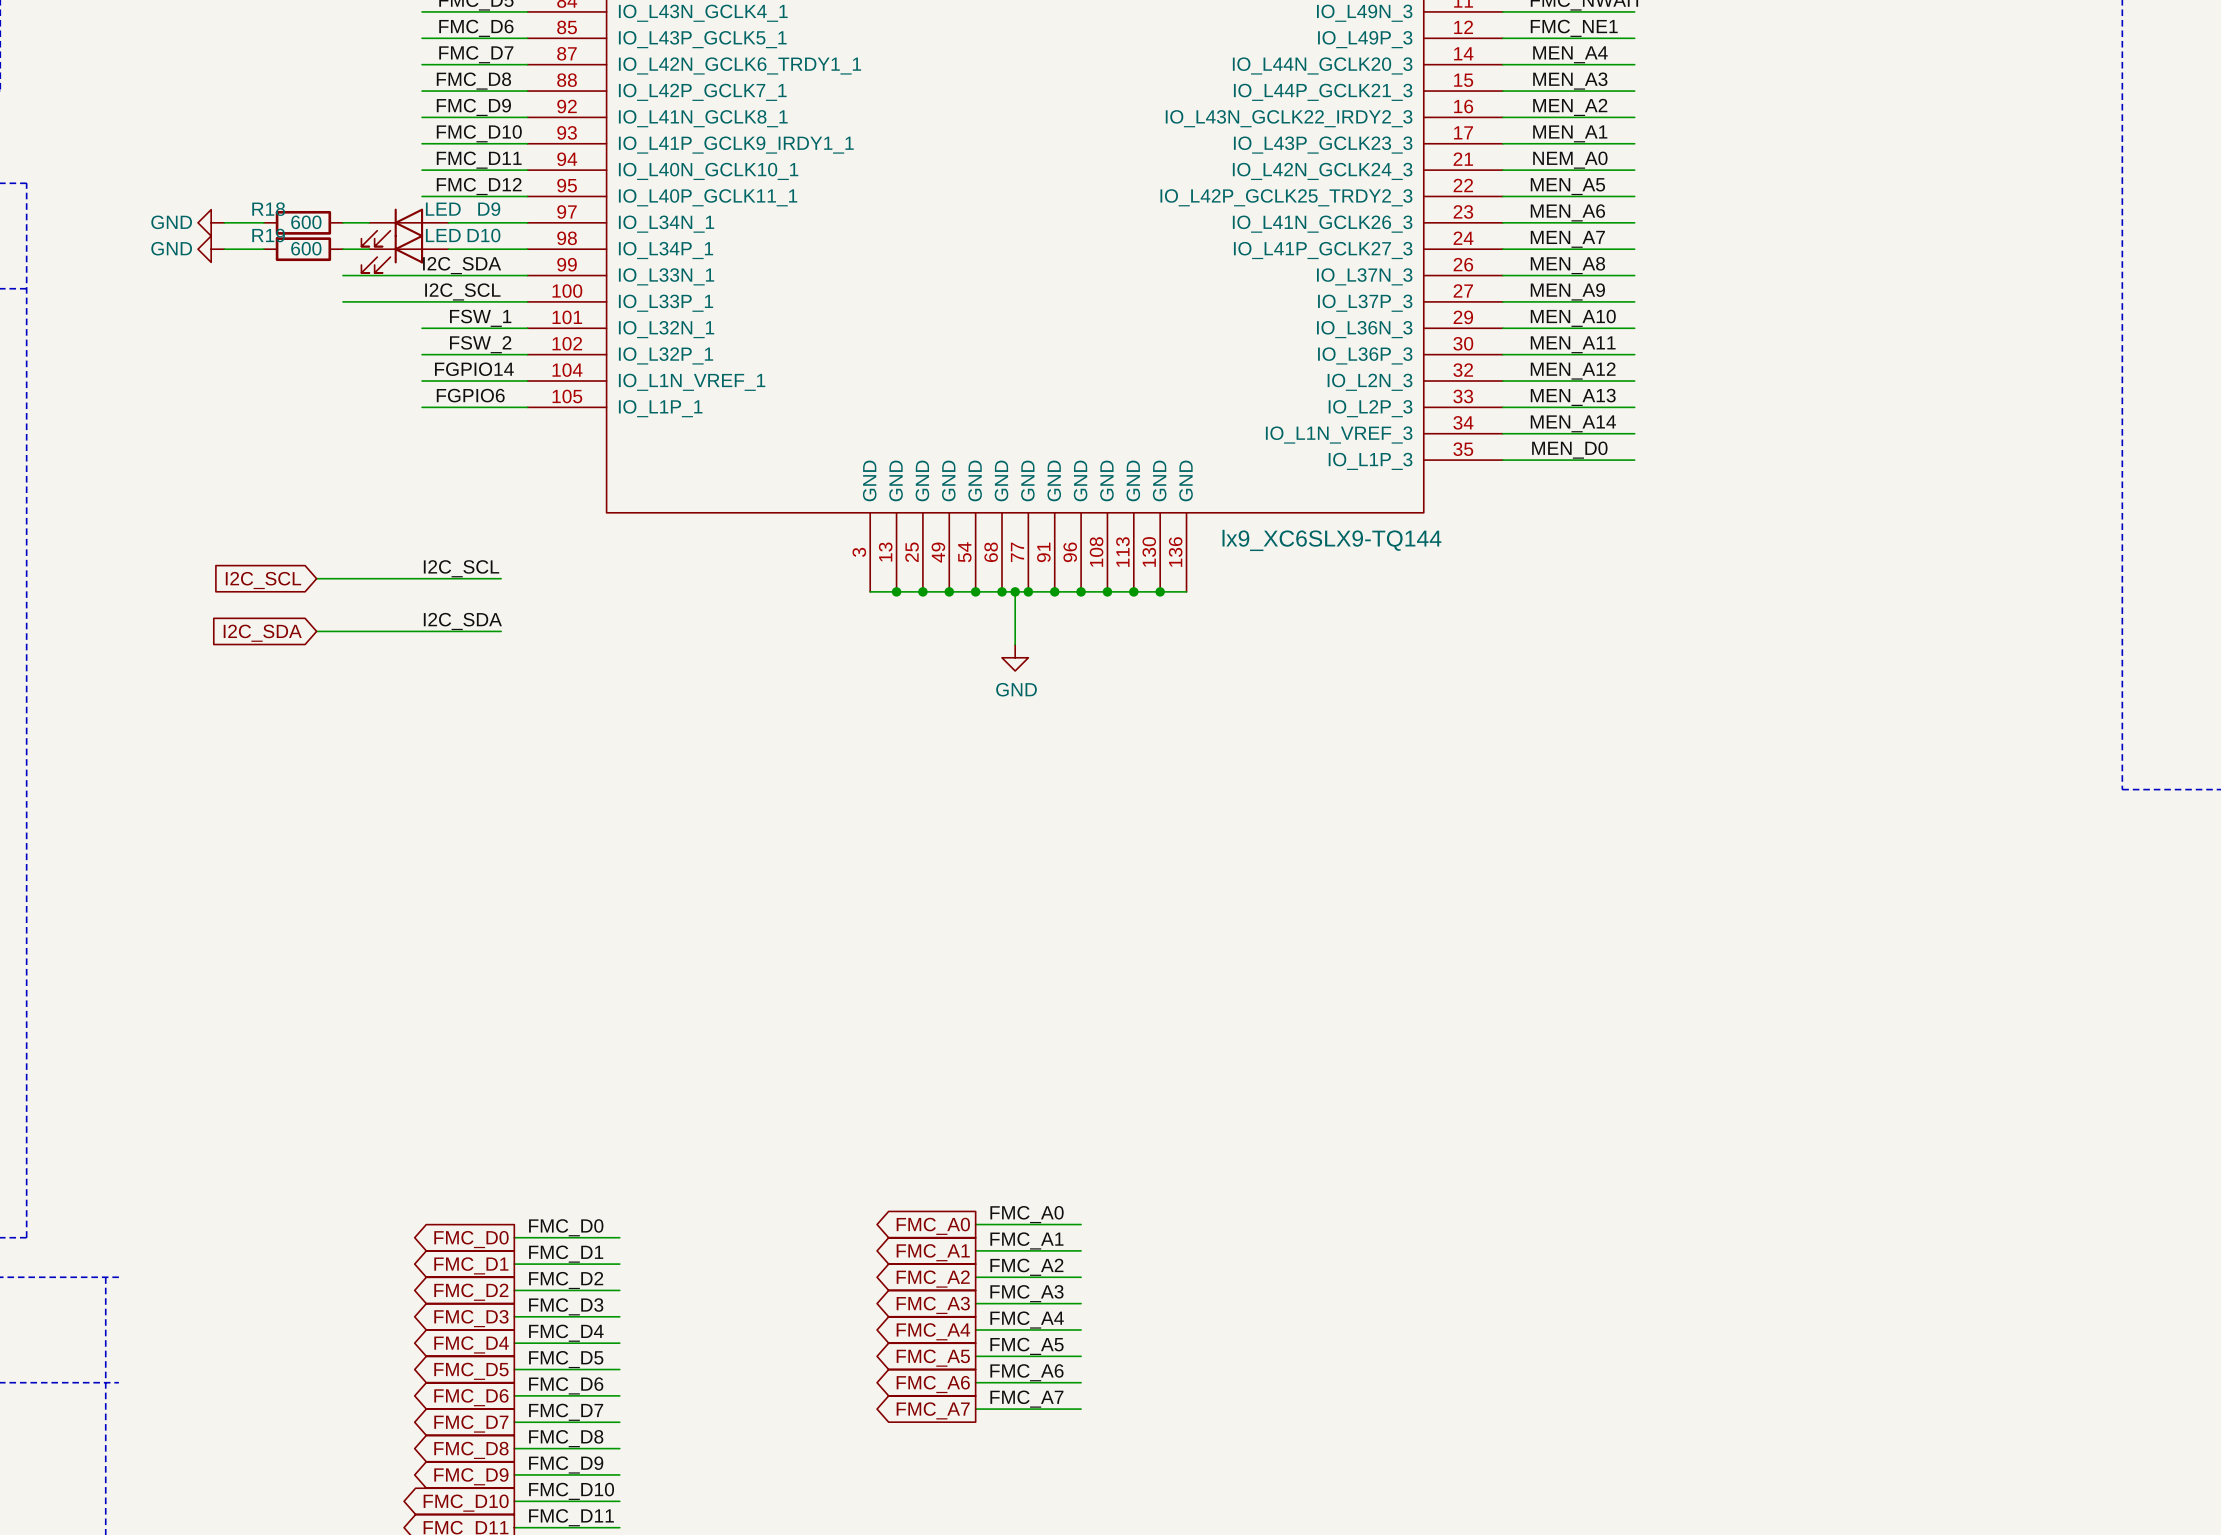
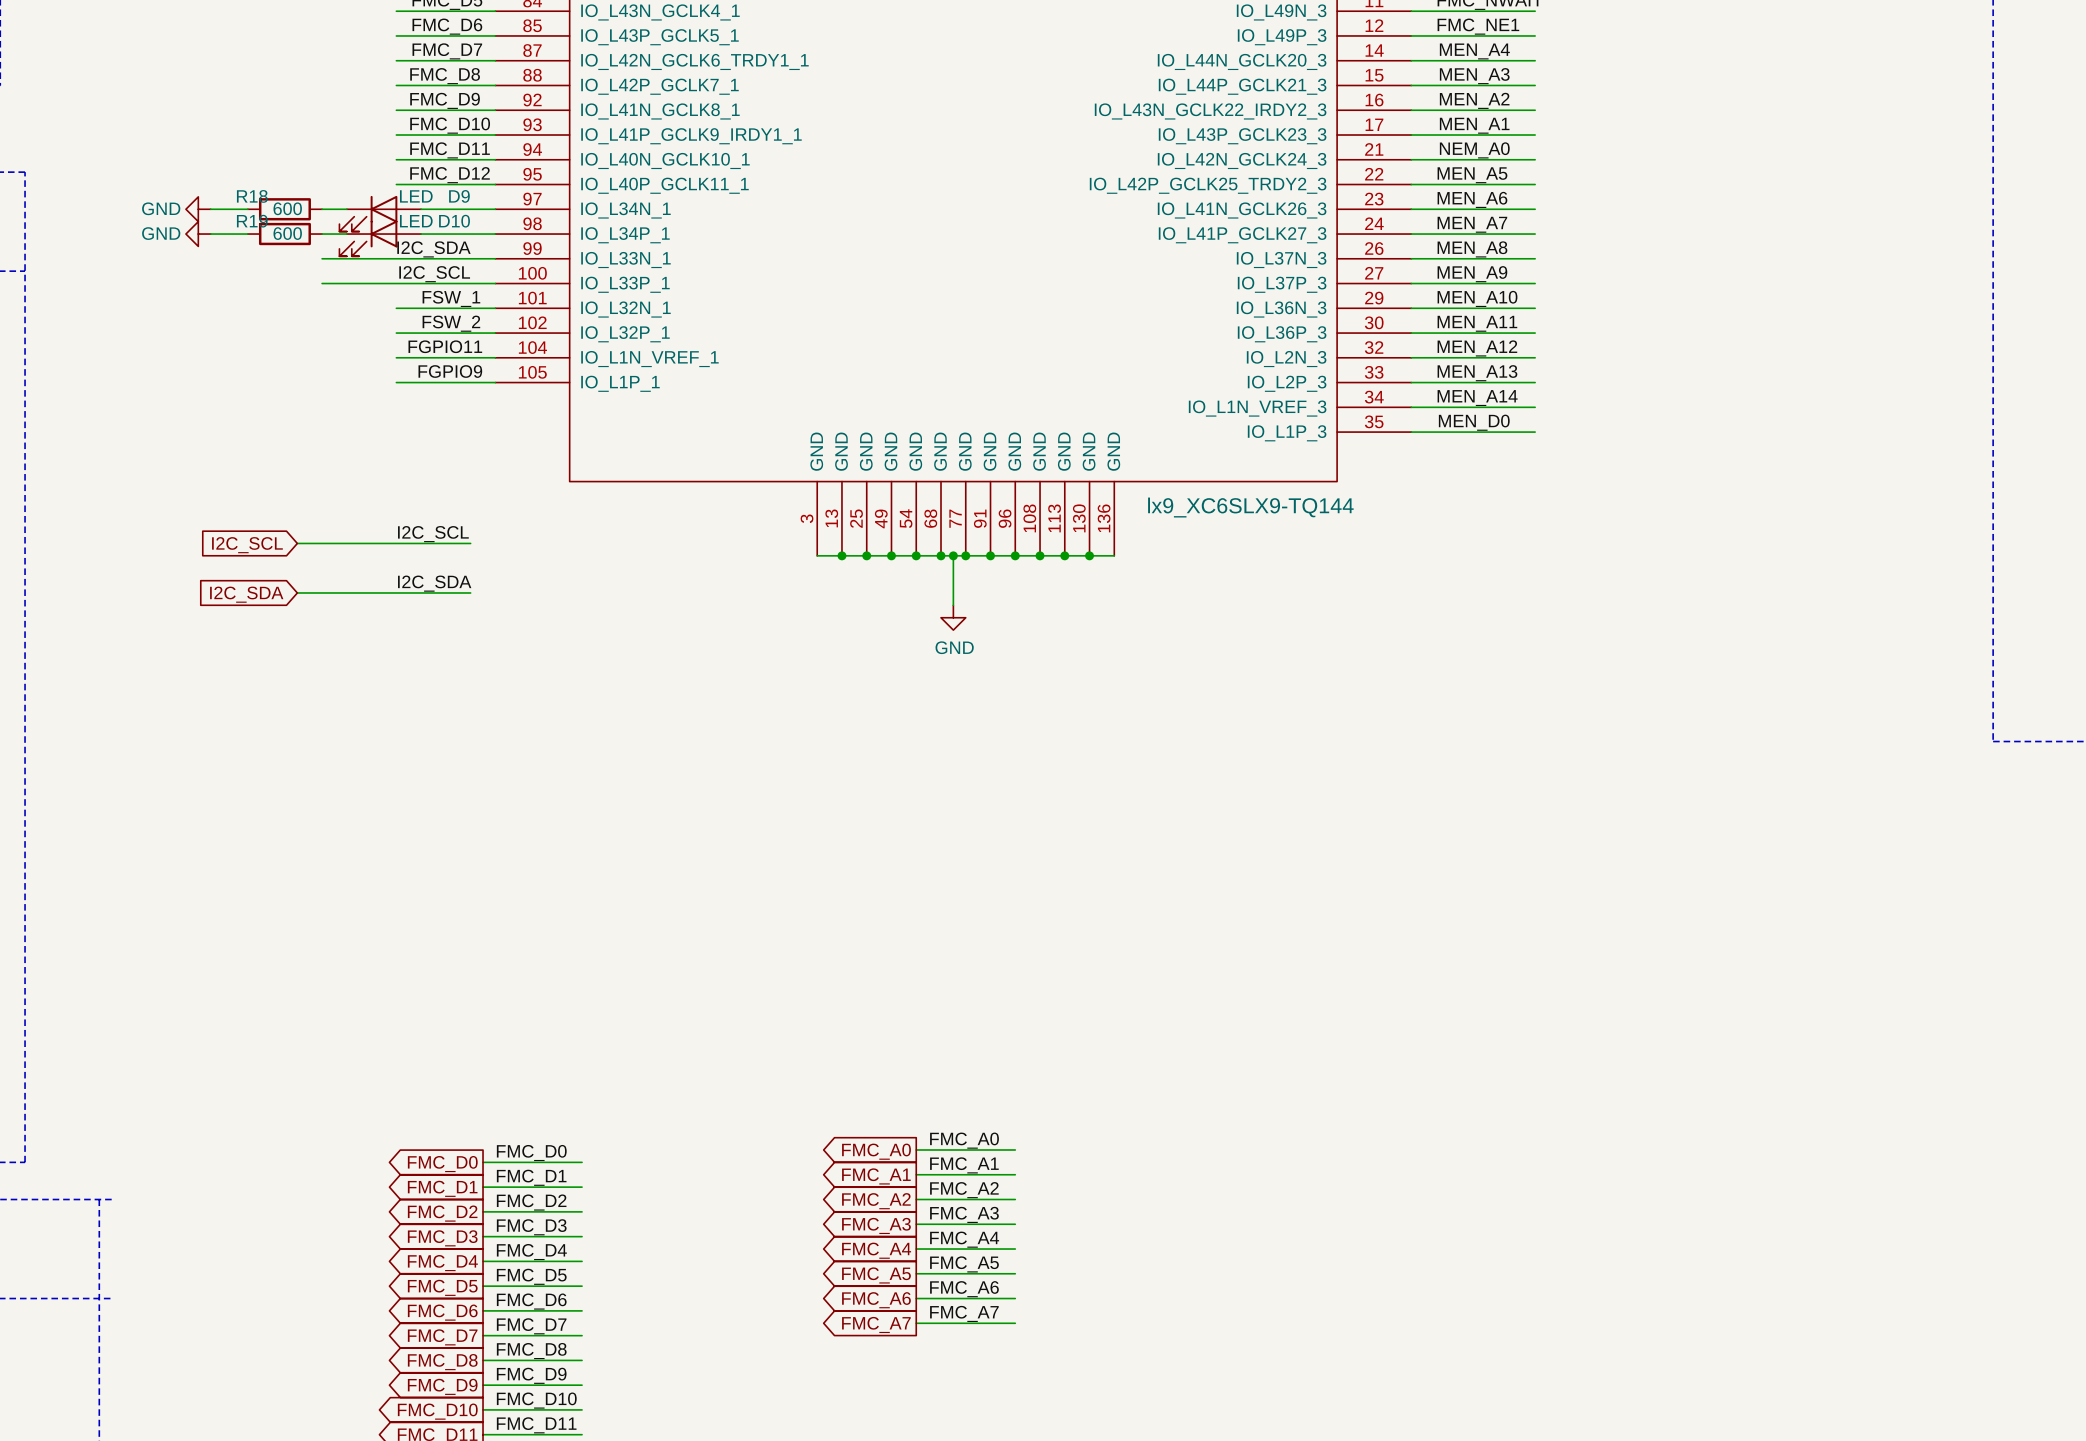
label: FGPIO14 (474, 369) -> FGPIO11 (445, 346)
label: FGPIO6 (470, 395) -> FGPIO9 (450, 371)

